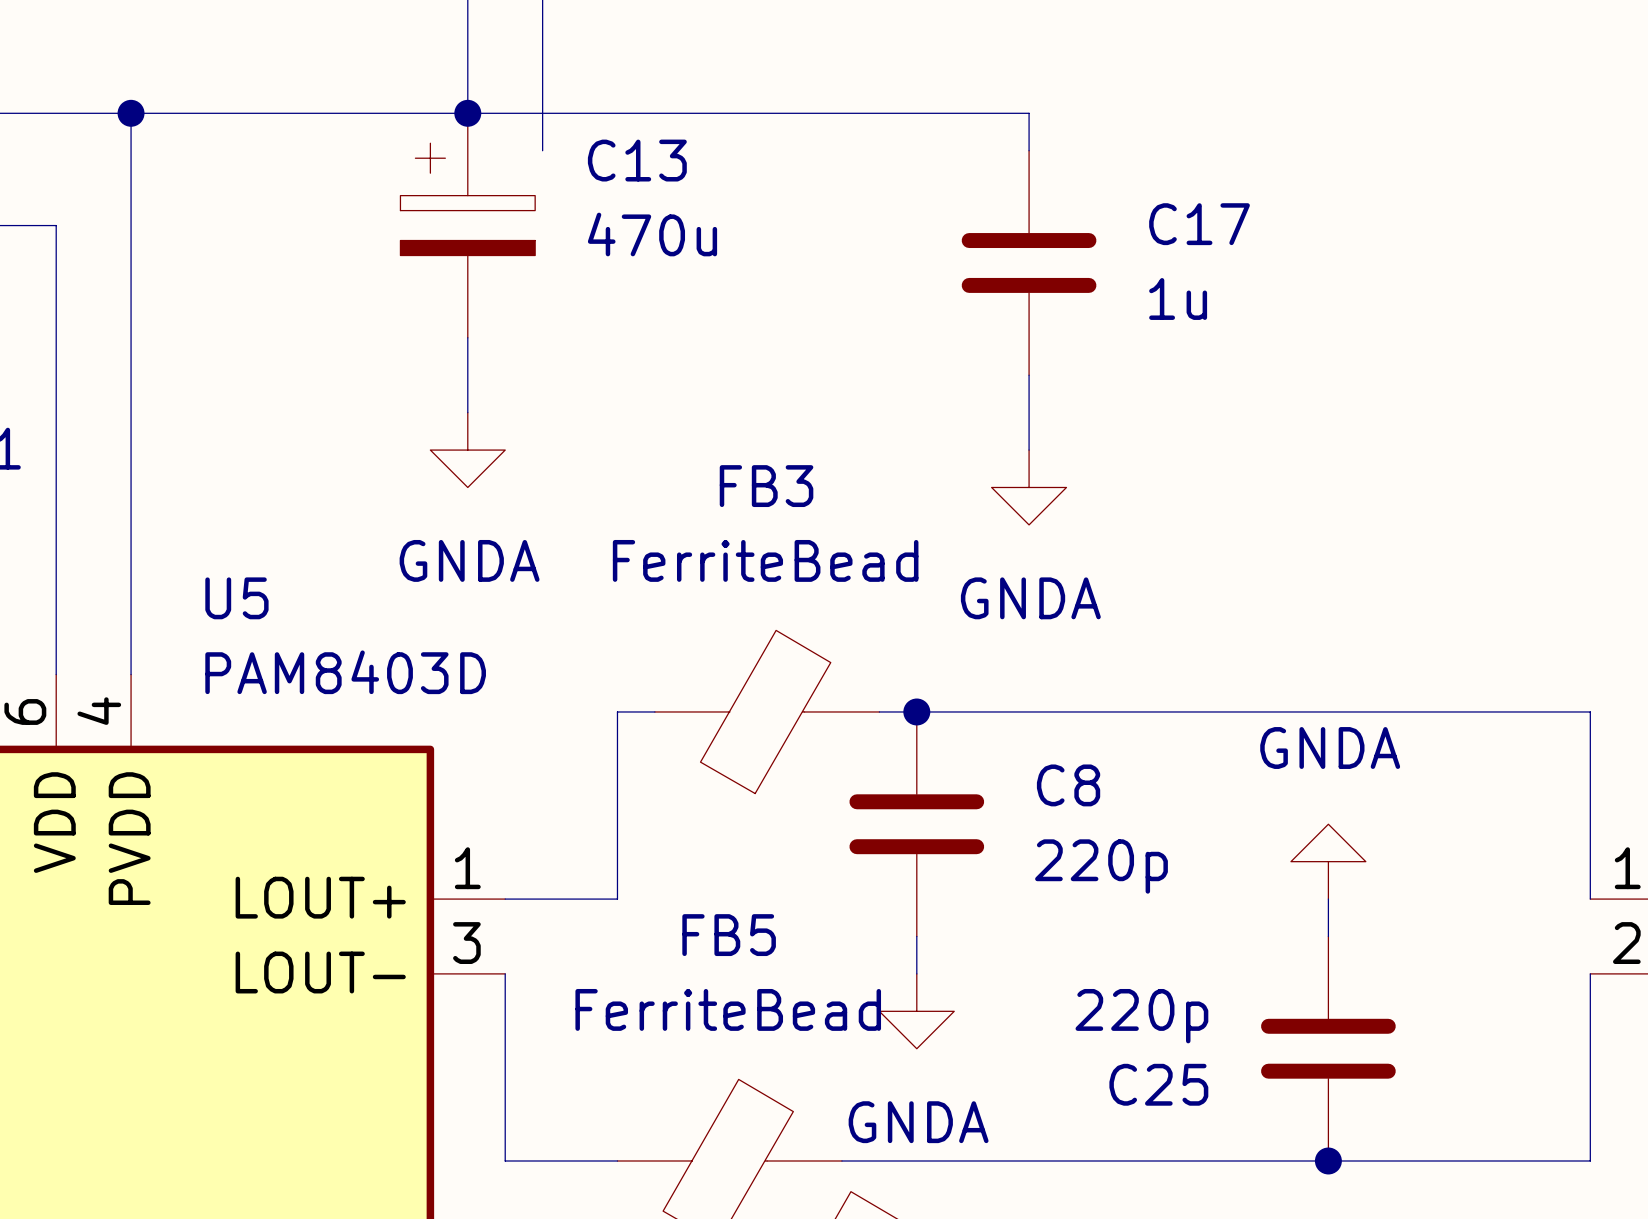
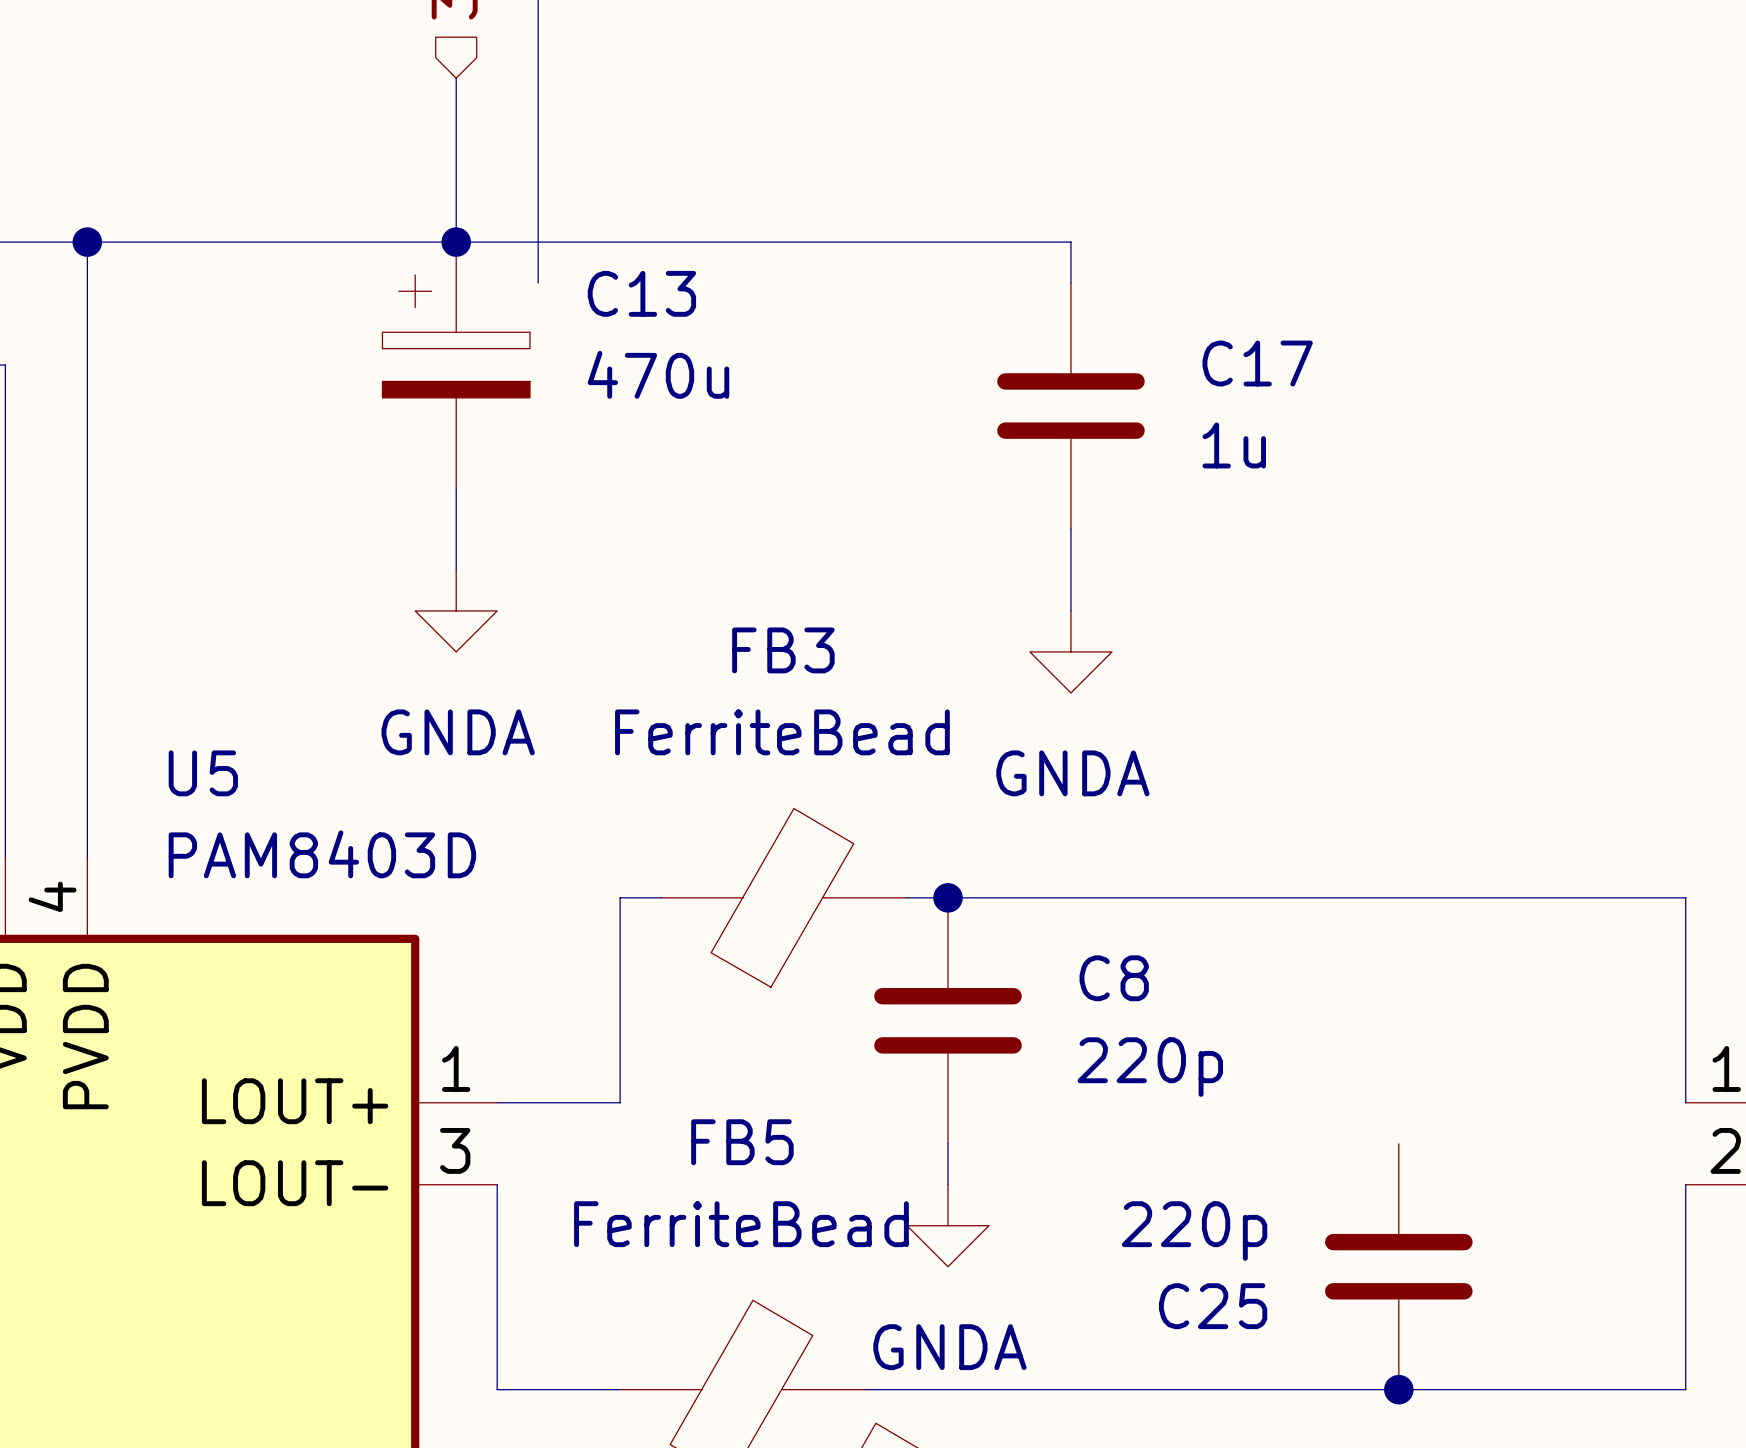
power symbol: GNDA (1328, 861) -> none
wire: (1328, 899) (1328, 936) -> none

